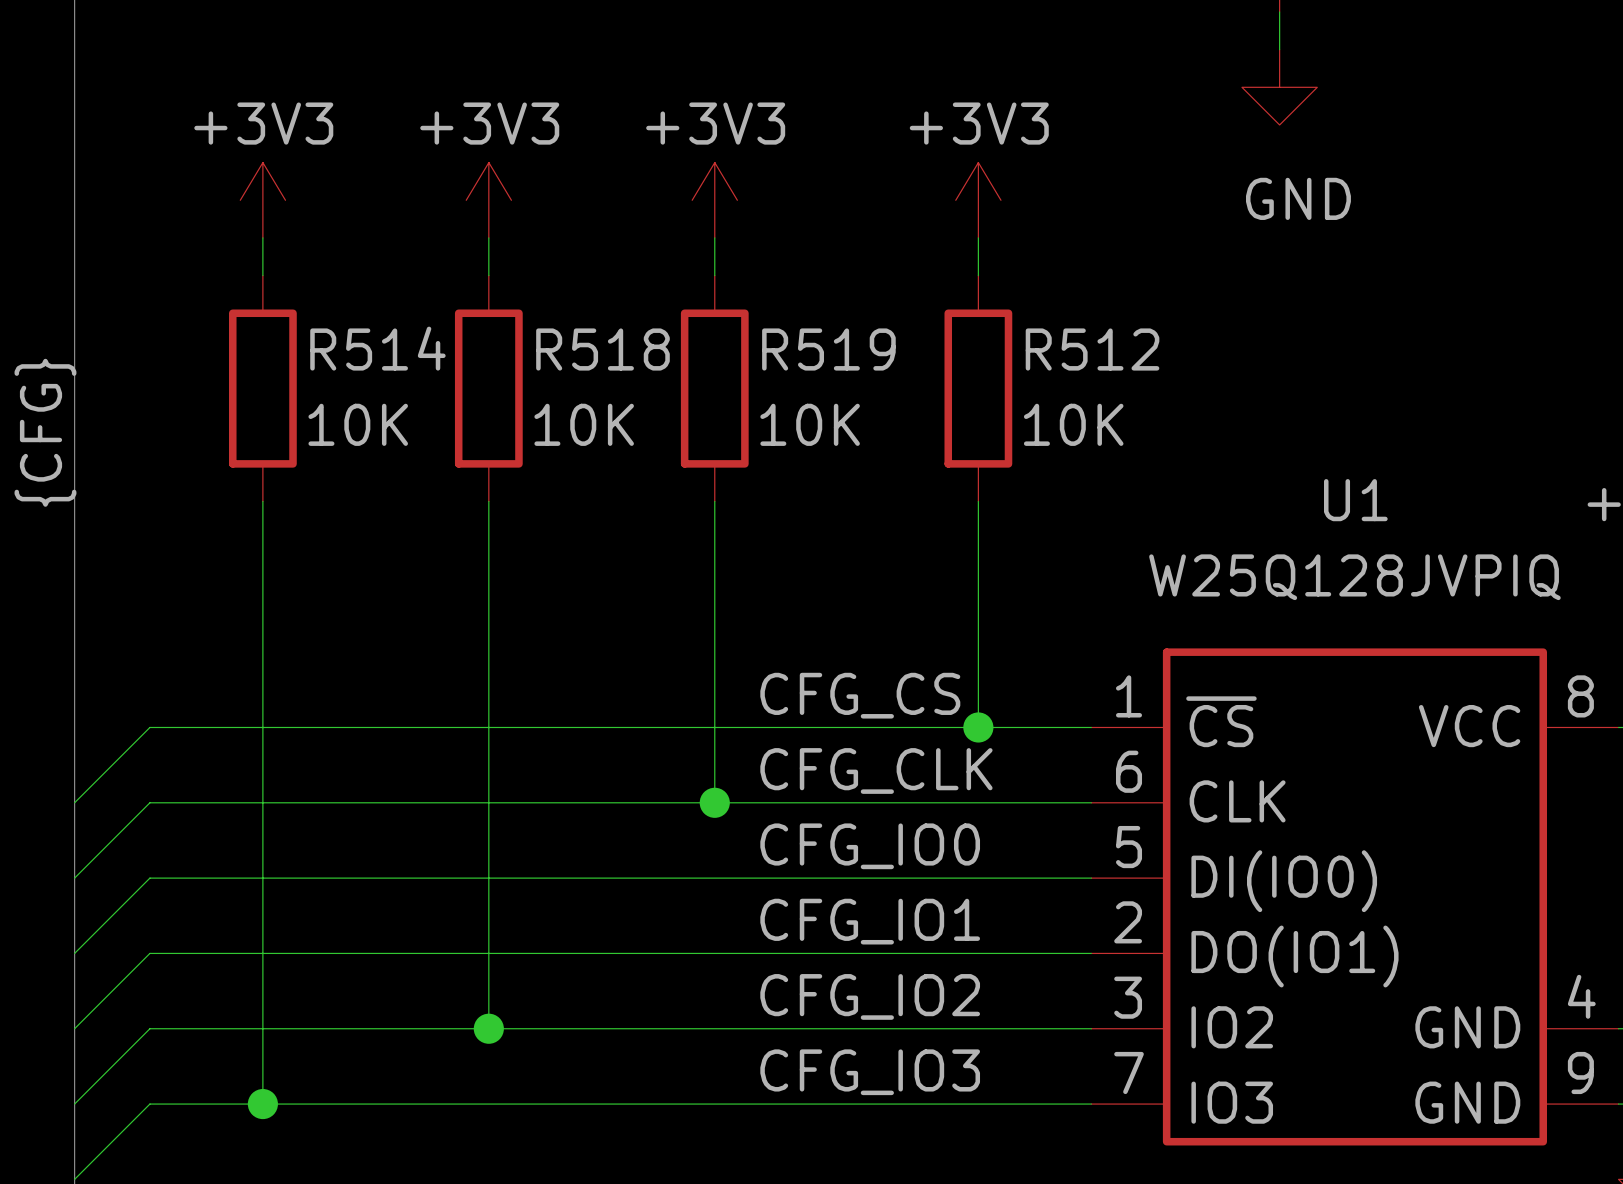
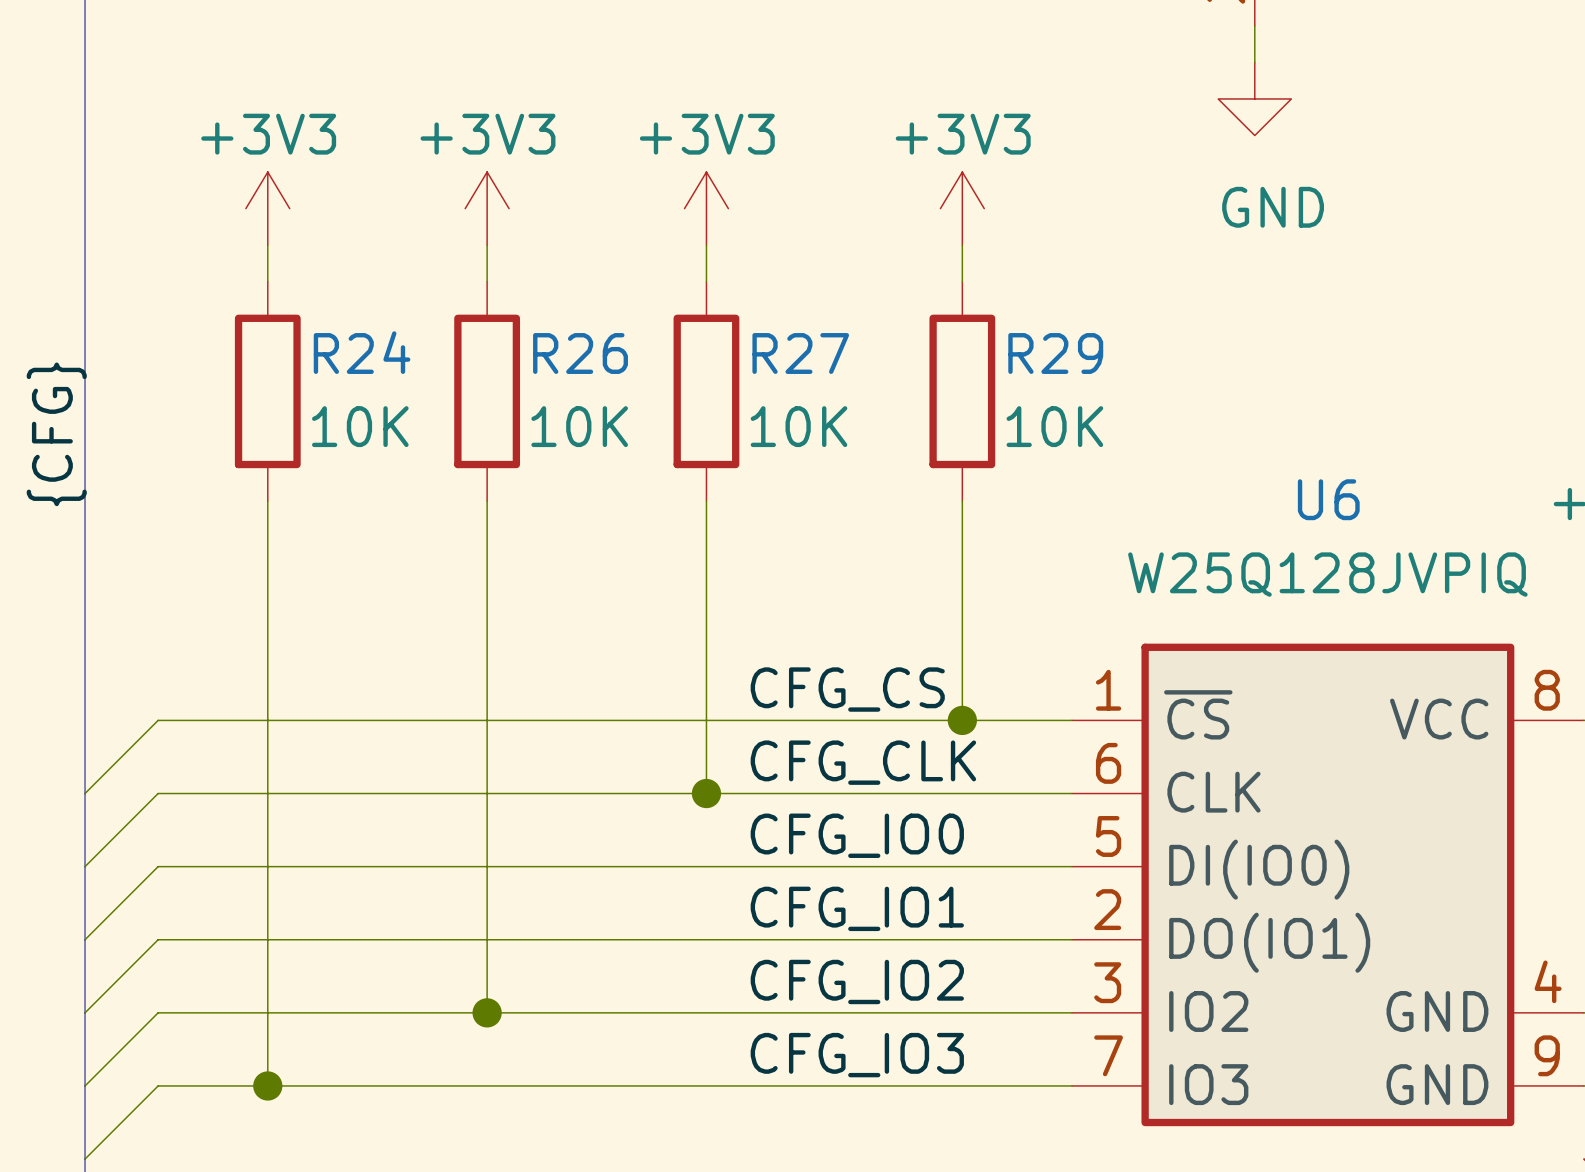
R514 name: R514 (377, 348) -> R24 (362, 352)
R518 name: R518 (602, 349) -> R26 (580, 353)
R519 name: R519 (828, 349) -> R27 (800, 353)
R512 name: R512 (1092, 349) -> R29 (1055, 353)
U1 name: U1 (1355, 500) -> U6 (1328, 499)

